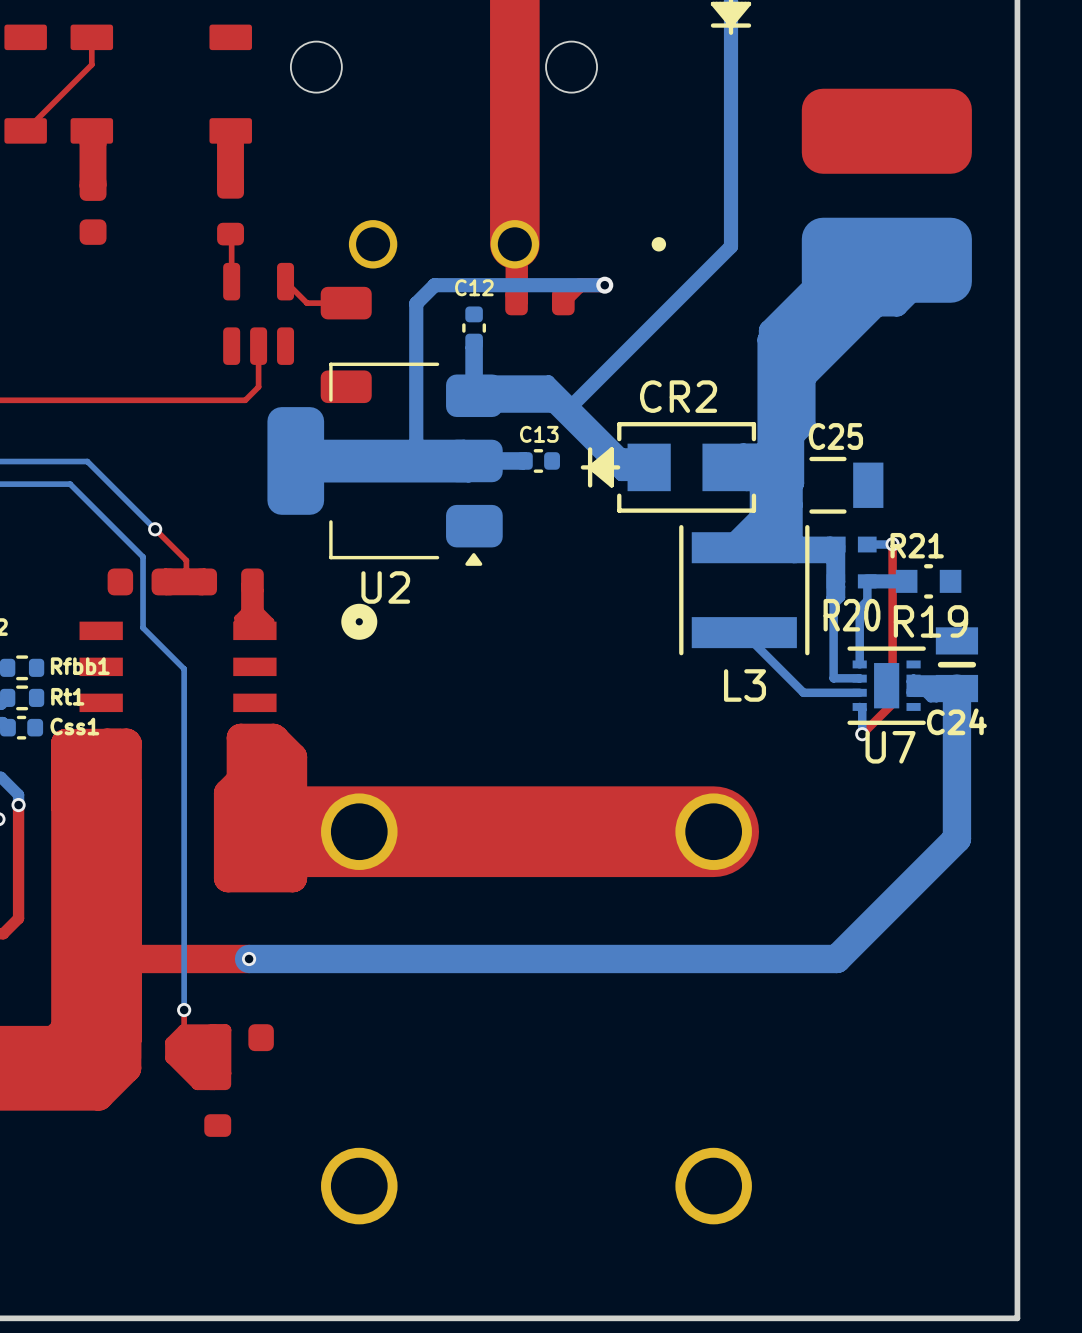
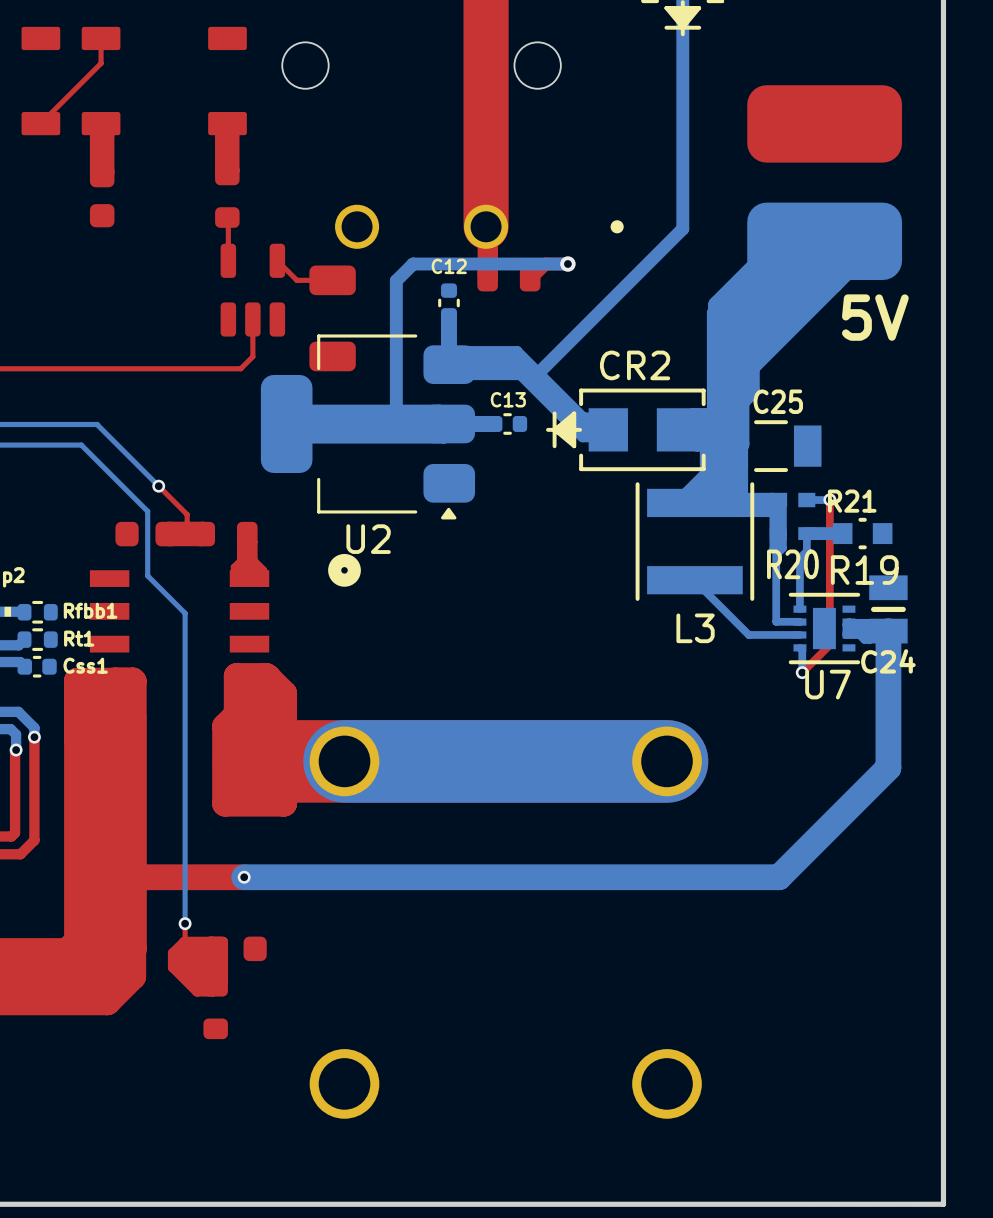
bottom track: none -> (833, 282) (751, 365) (747, 365)
text: none -> 5V (875, 317)
bottom track: none -> (667, 761) (344, 761)

